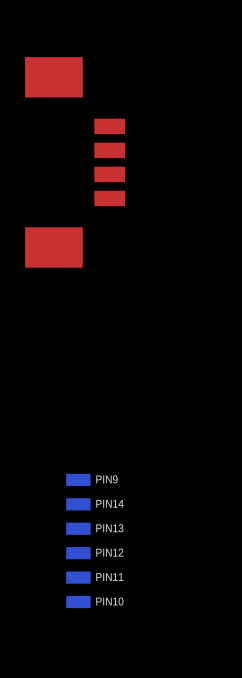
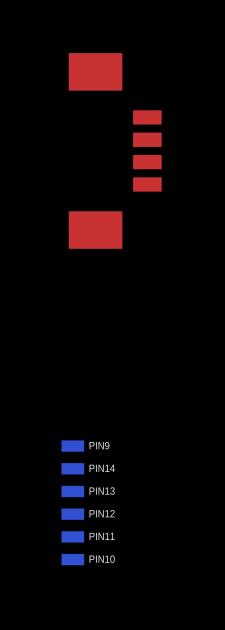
part position: (75, 162) -> (115, 150)

